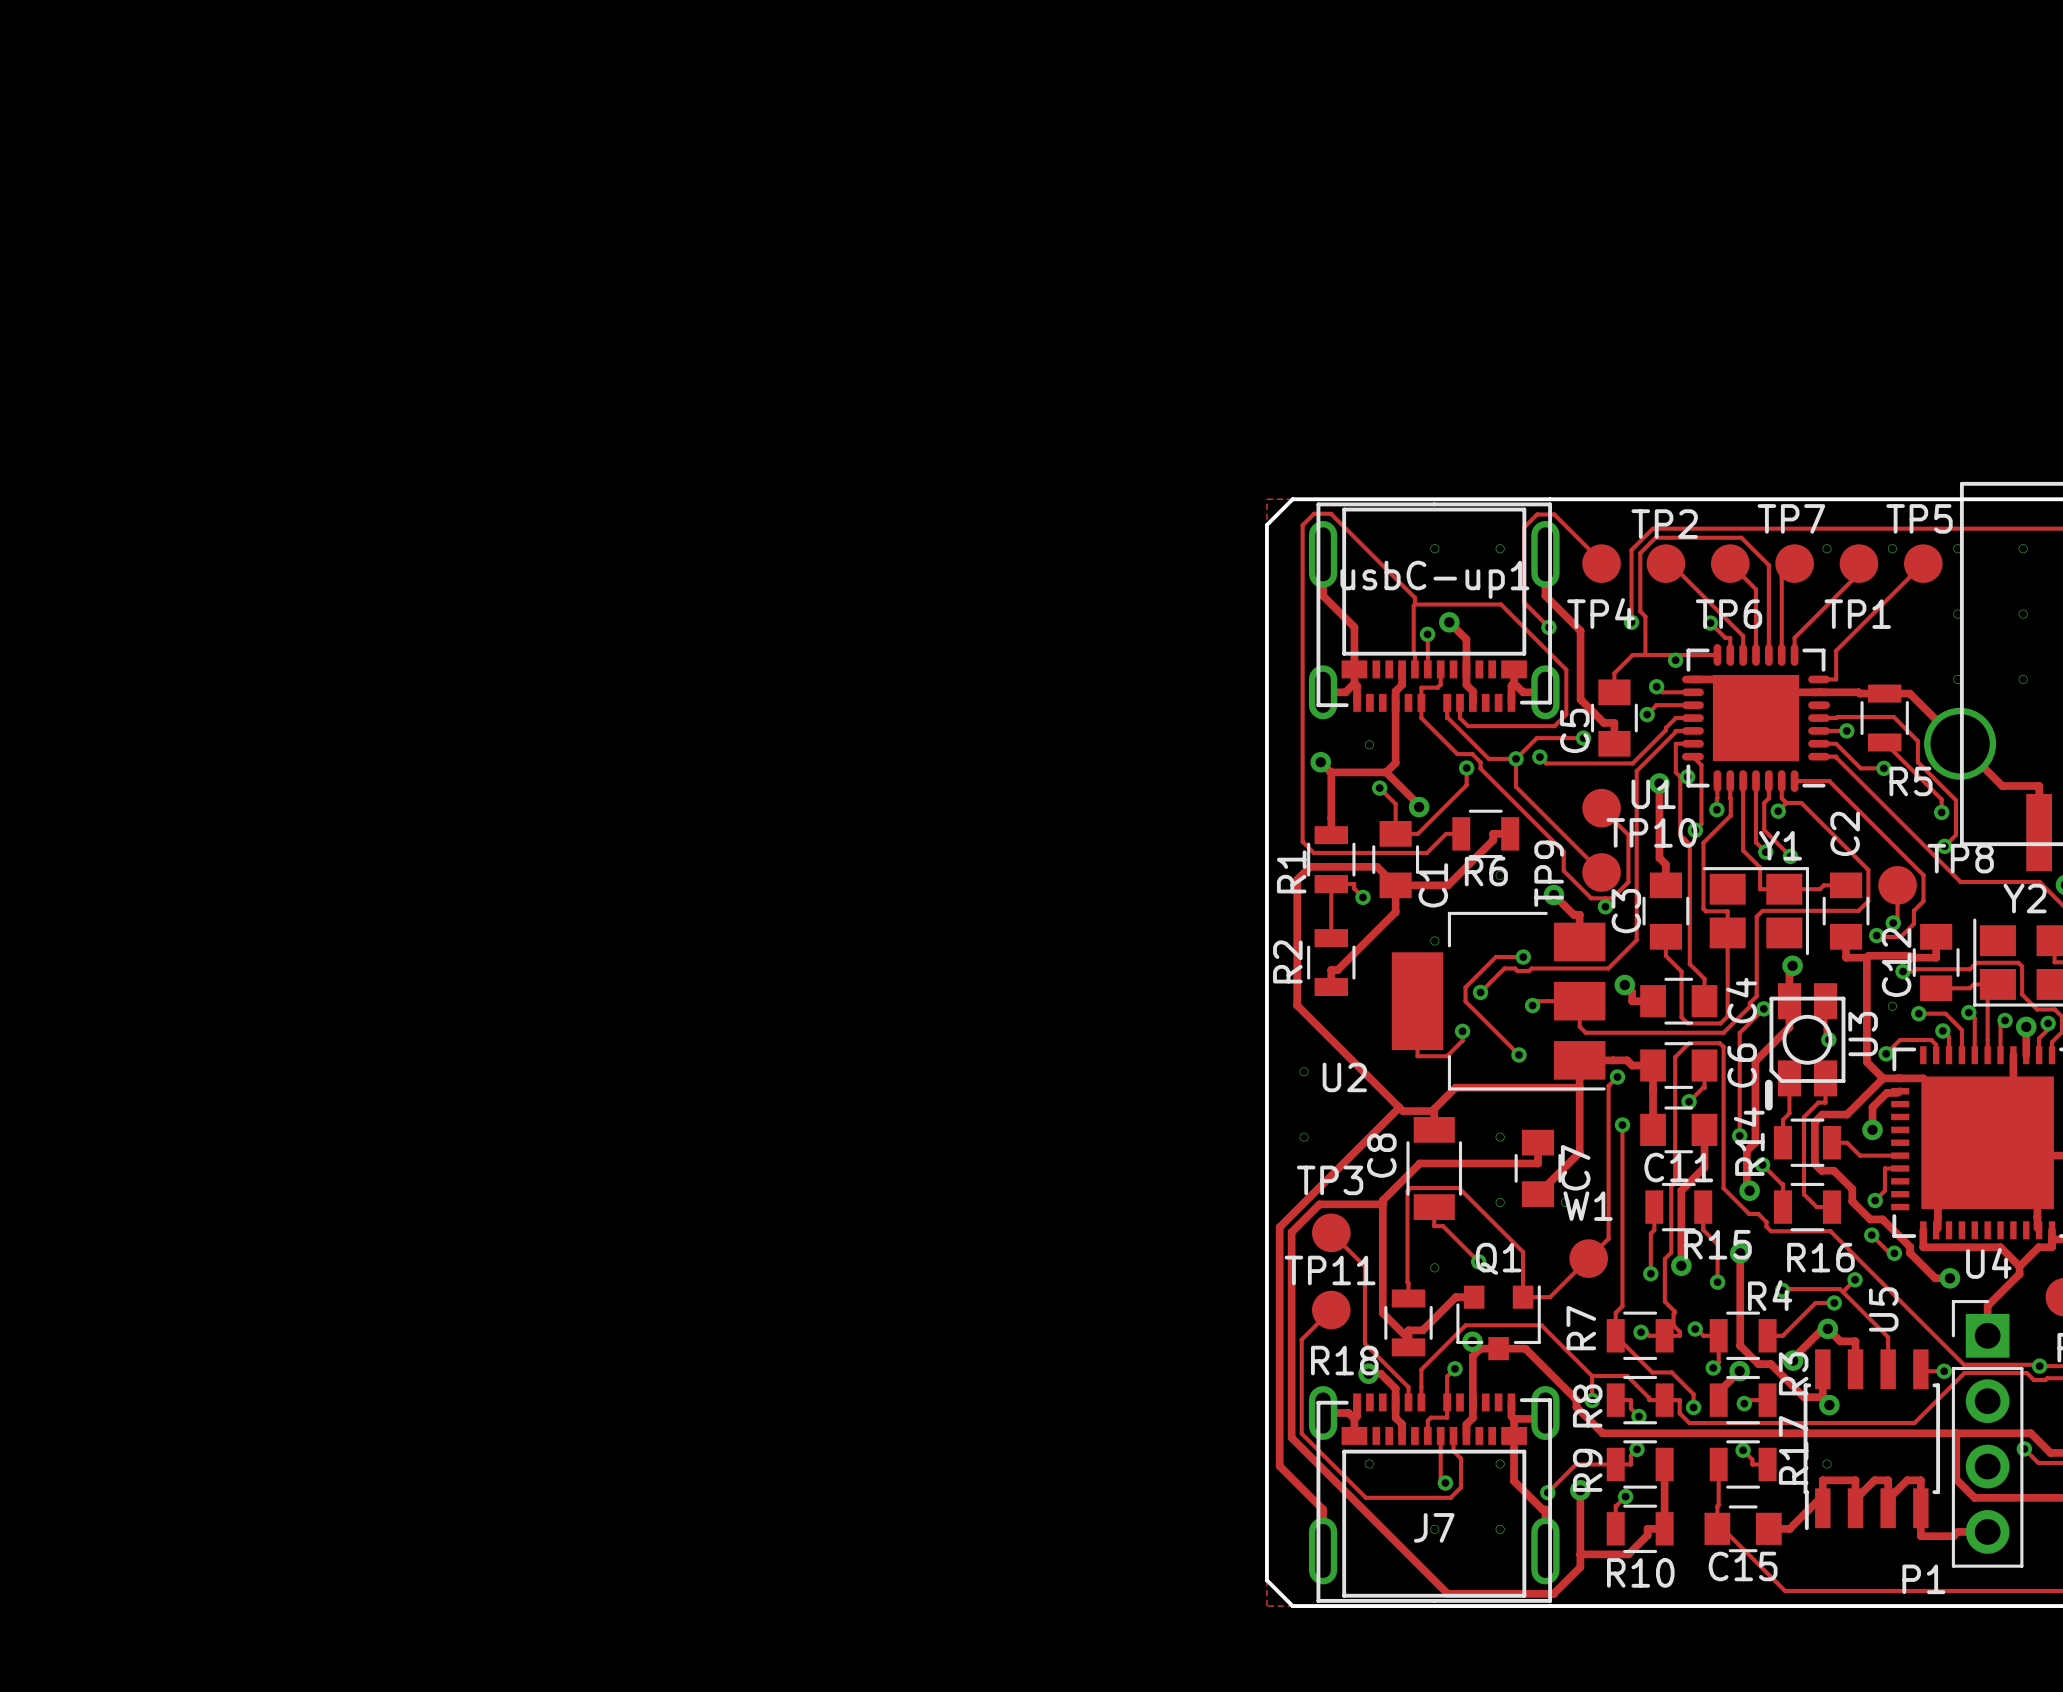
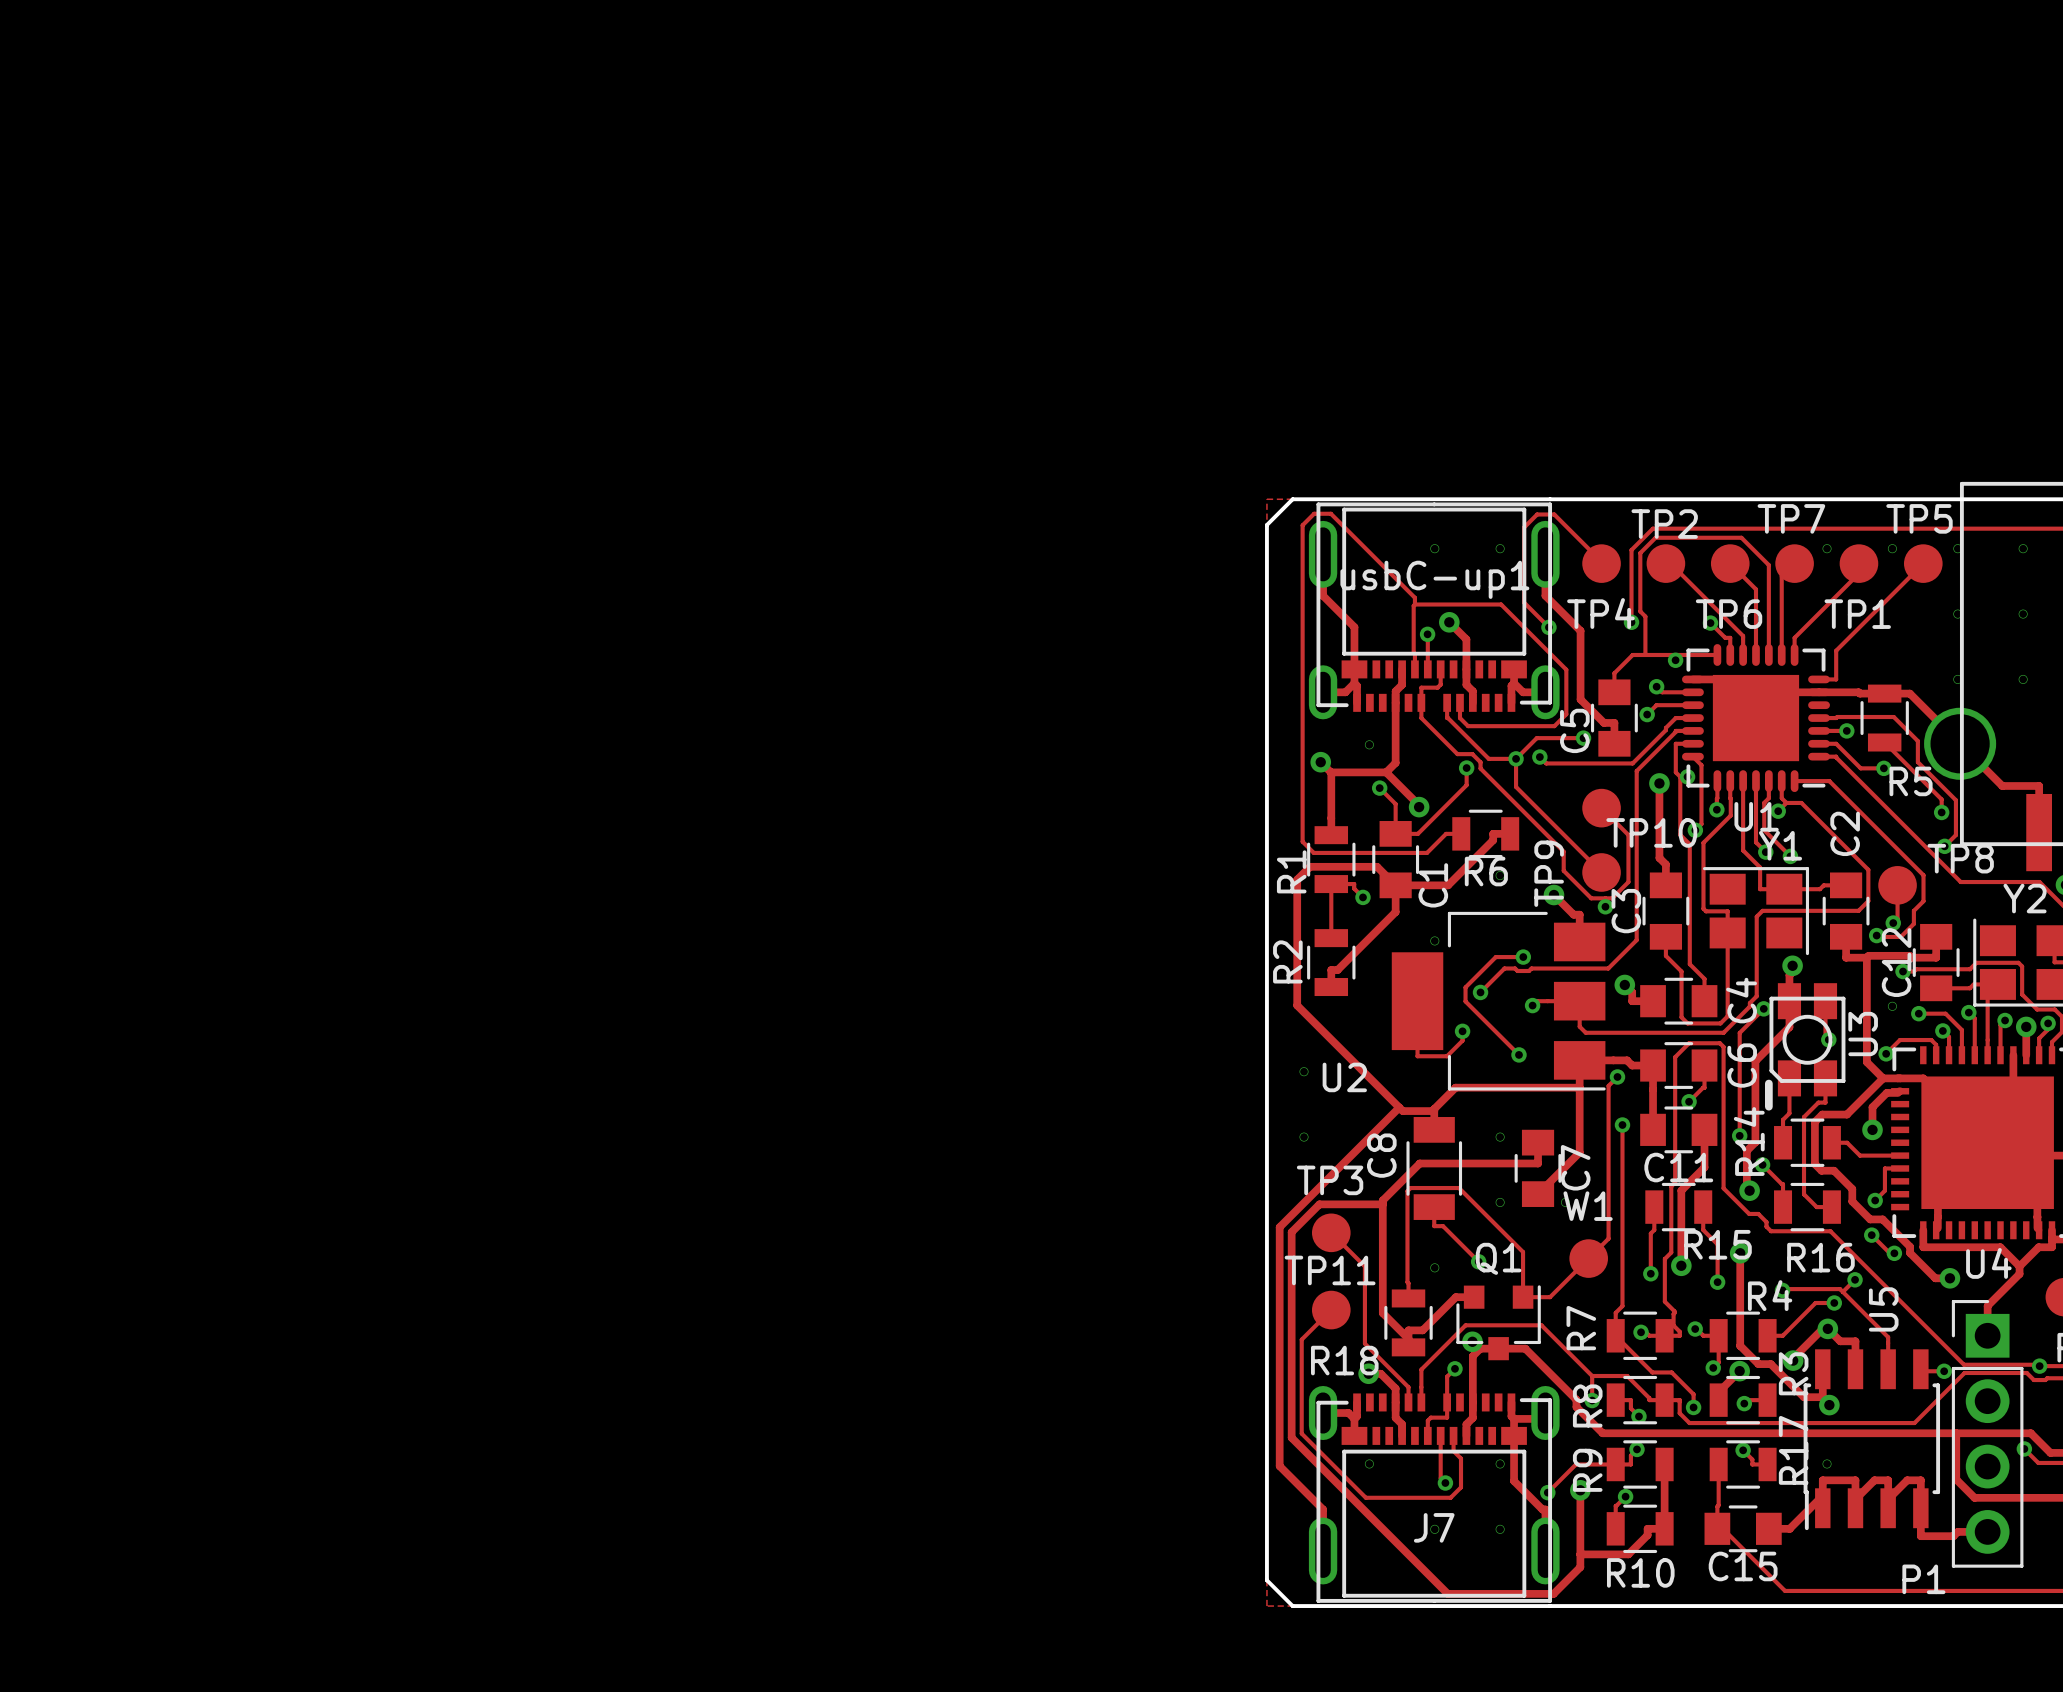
U1 name position: U1 (1653, 794) -> U1 (1756, 816)

